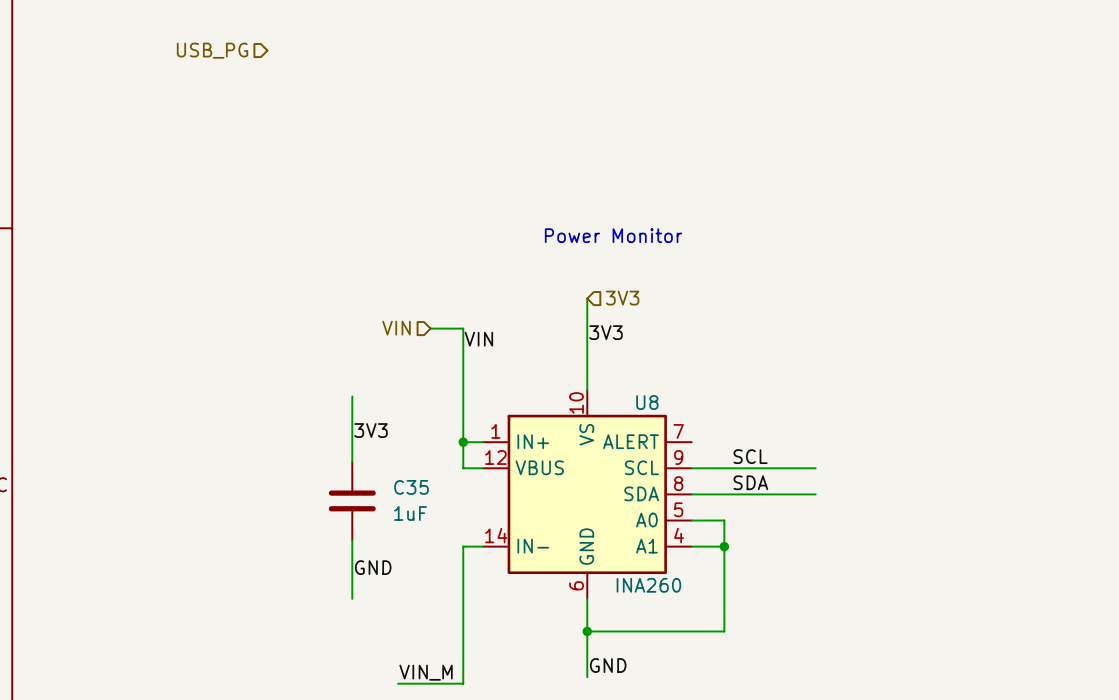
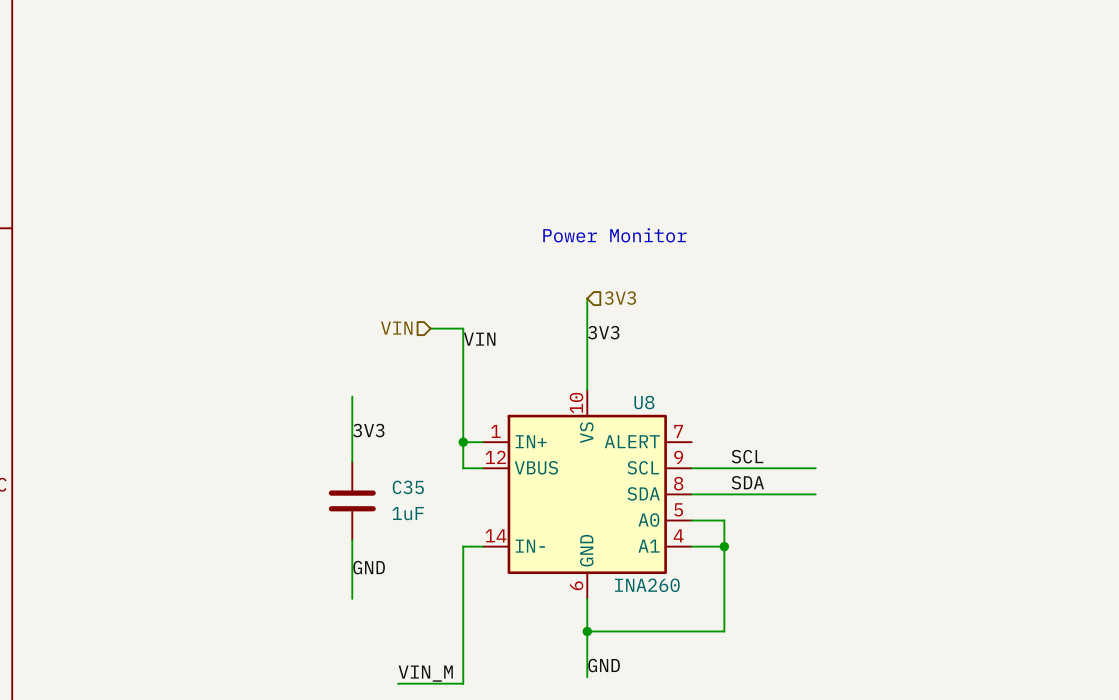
hierarchical label: USB_PG (212, 50) -> none

